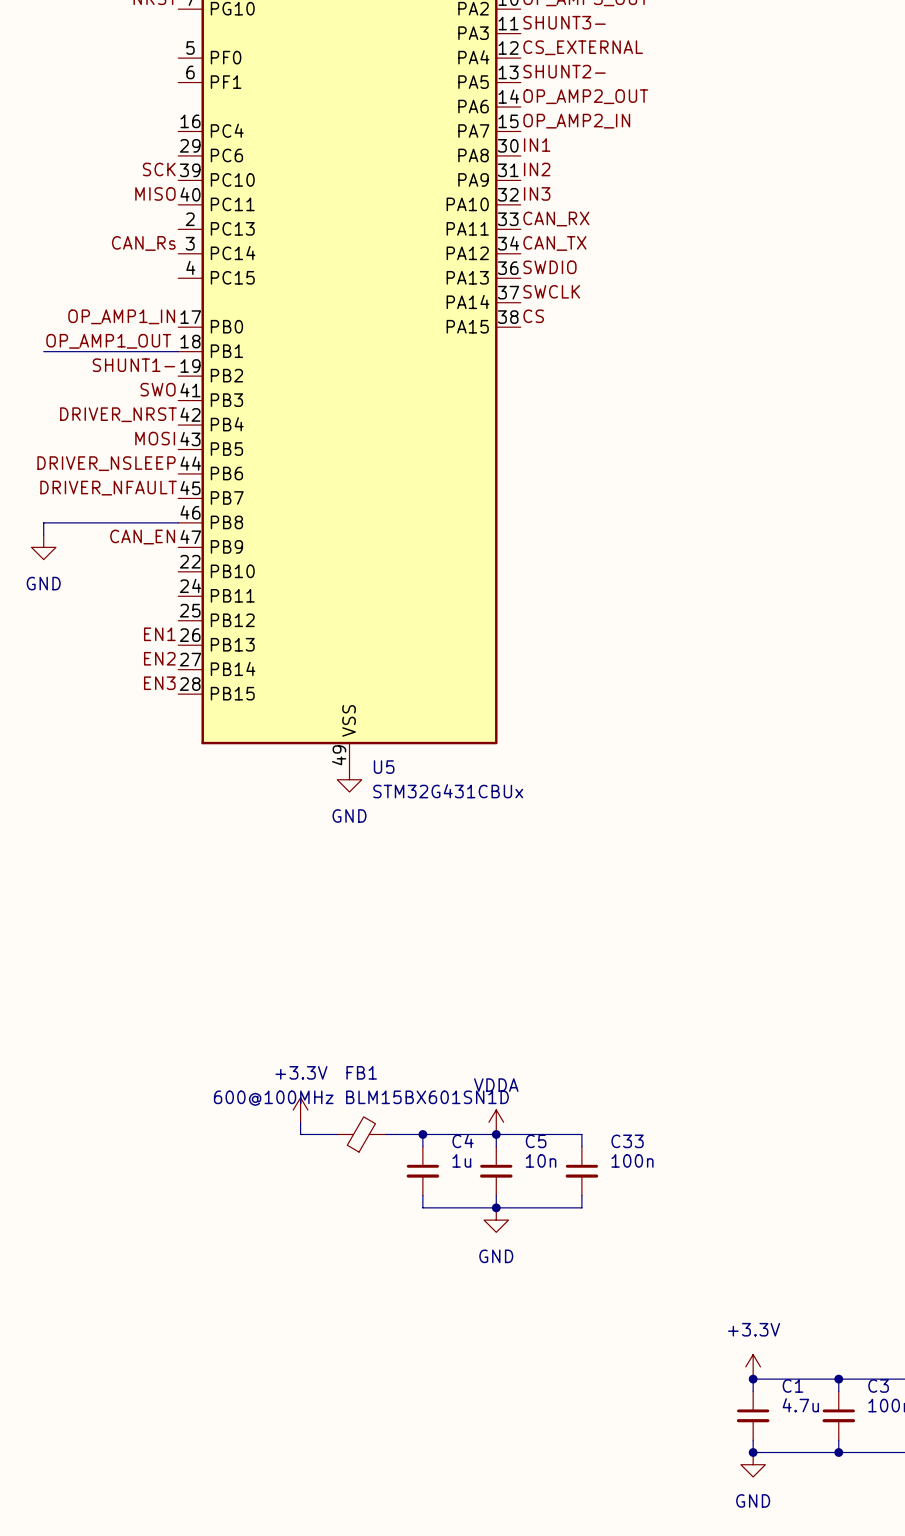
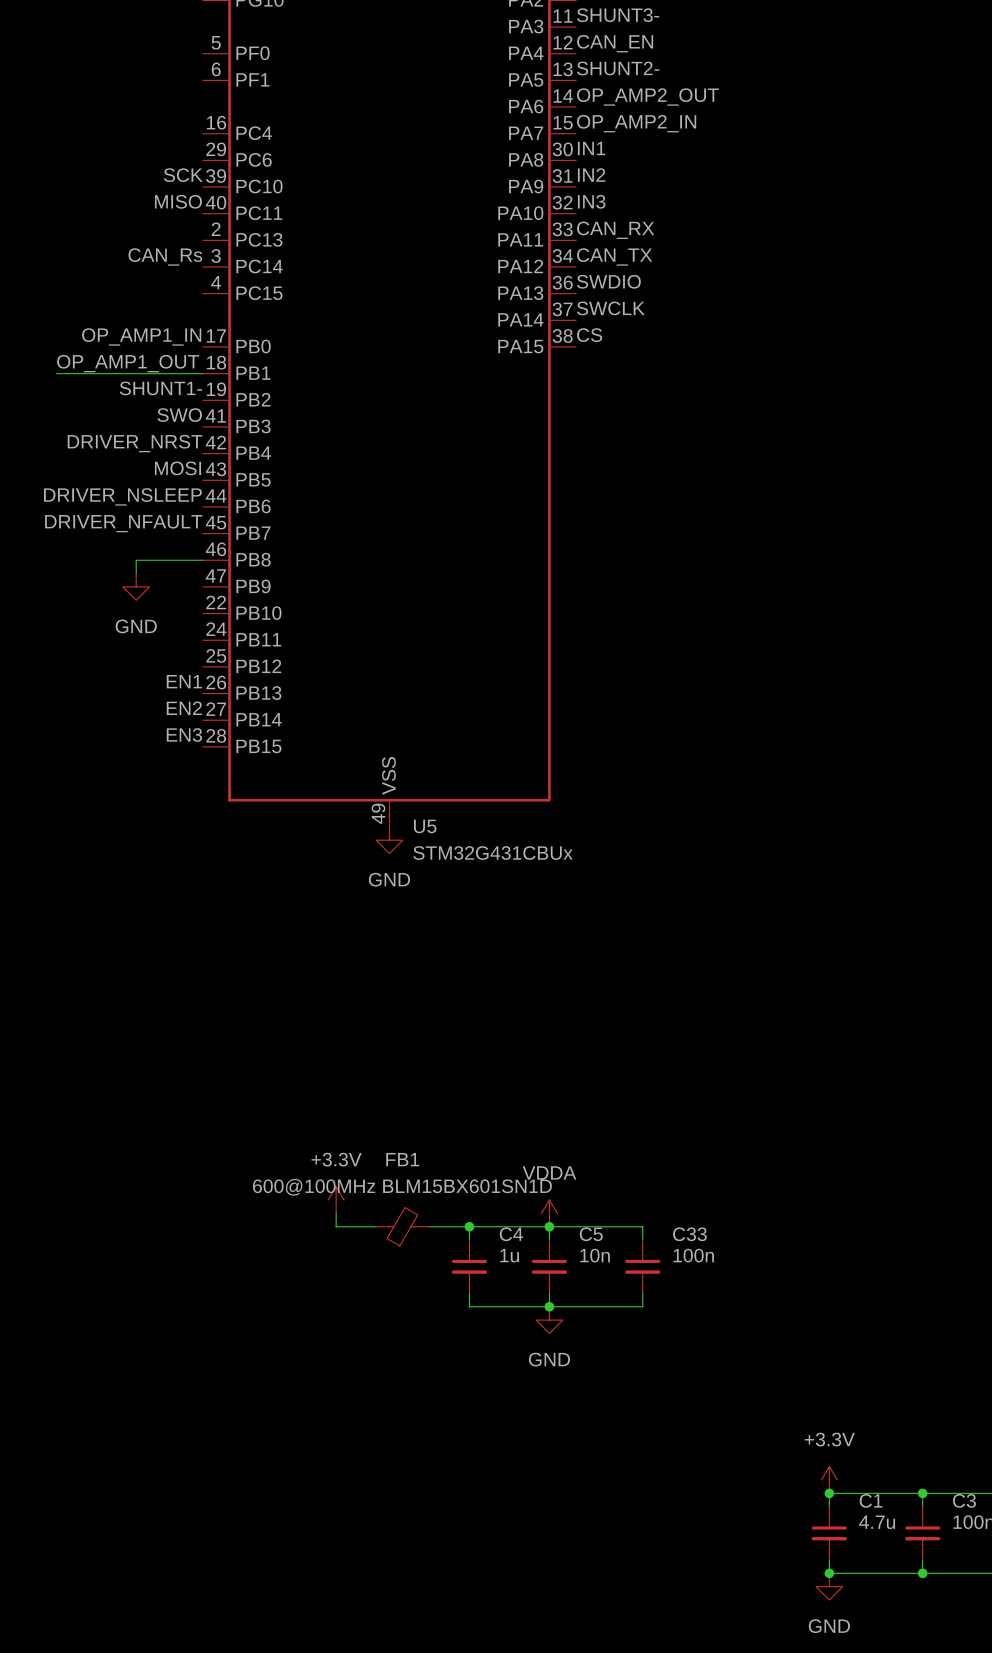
label: CS_EXTERNAL (583, 47) -> CAN_EN (615, 43)
wire: (117, 522) (43, 522) (43, 535) -> (136, 560) (136, 573)
label: CAN_EN (142, 537) -> none
power symbol position: GND (43, 547) -> GND (136, 586)

